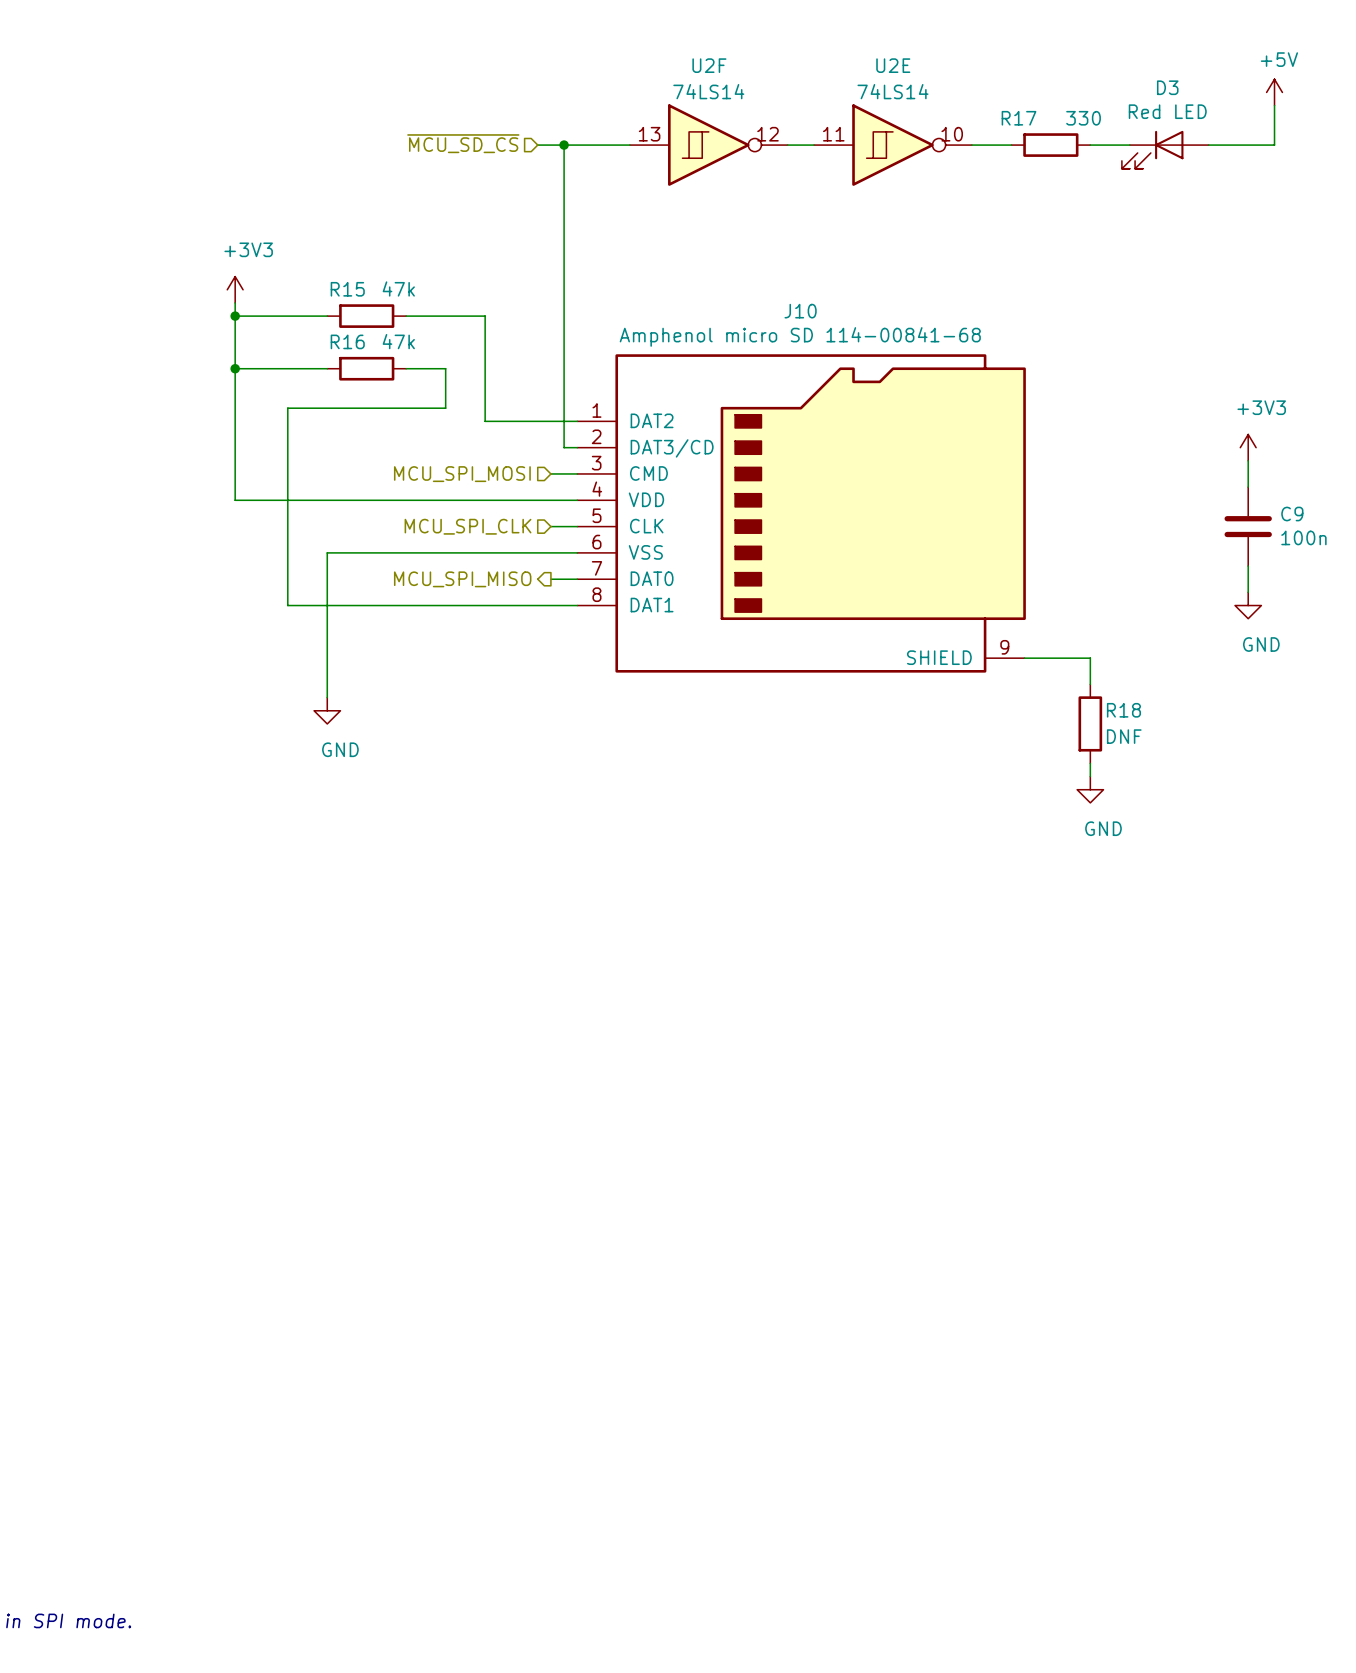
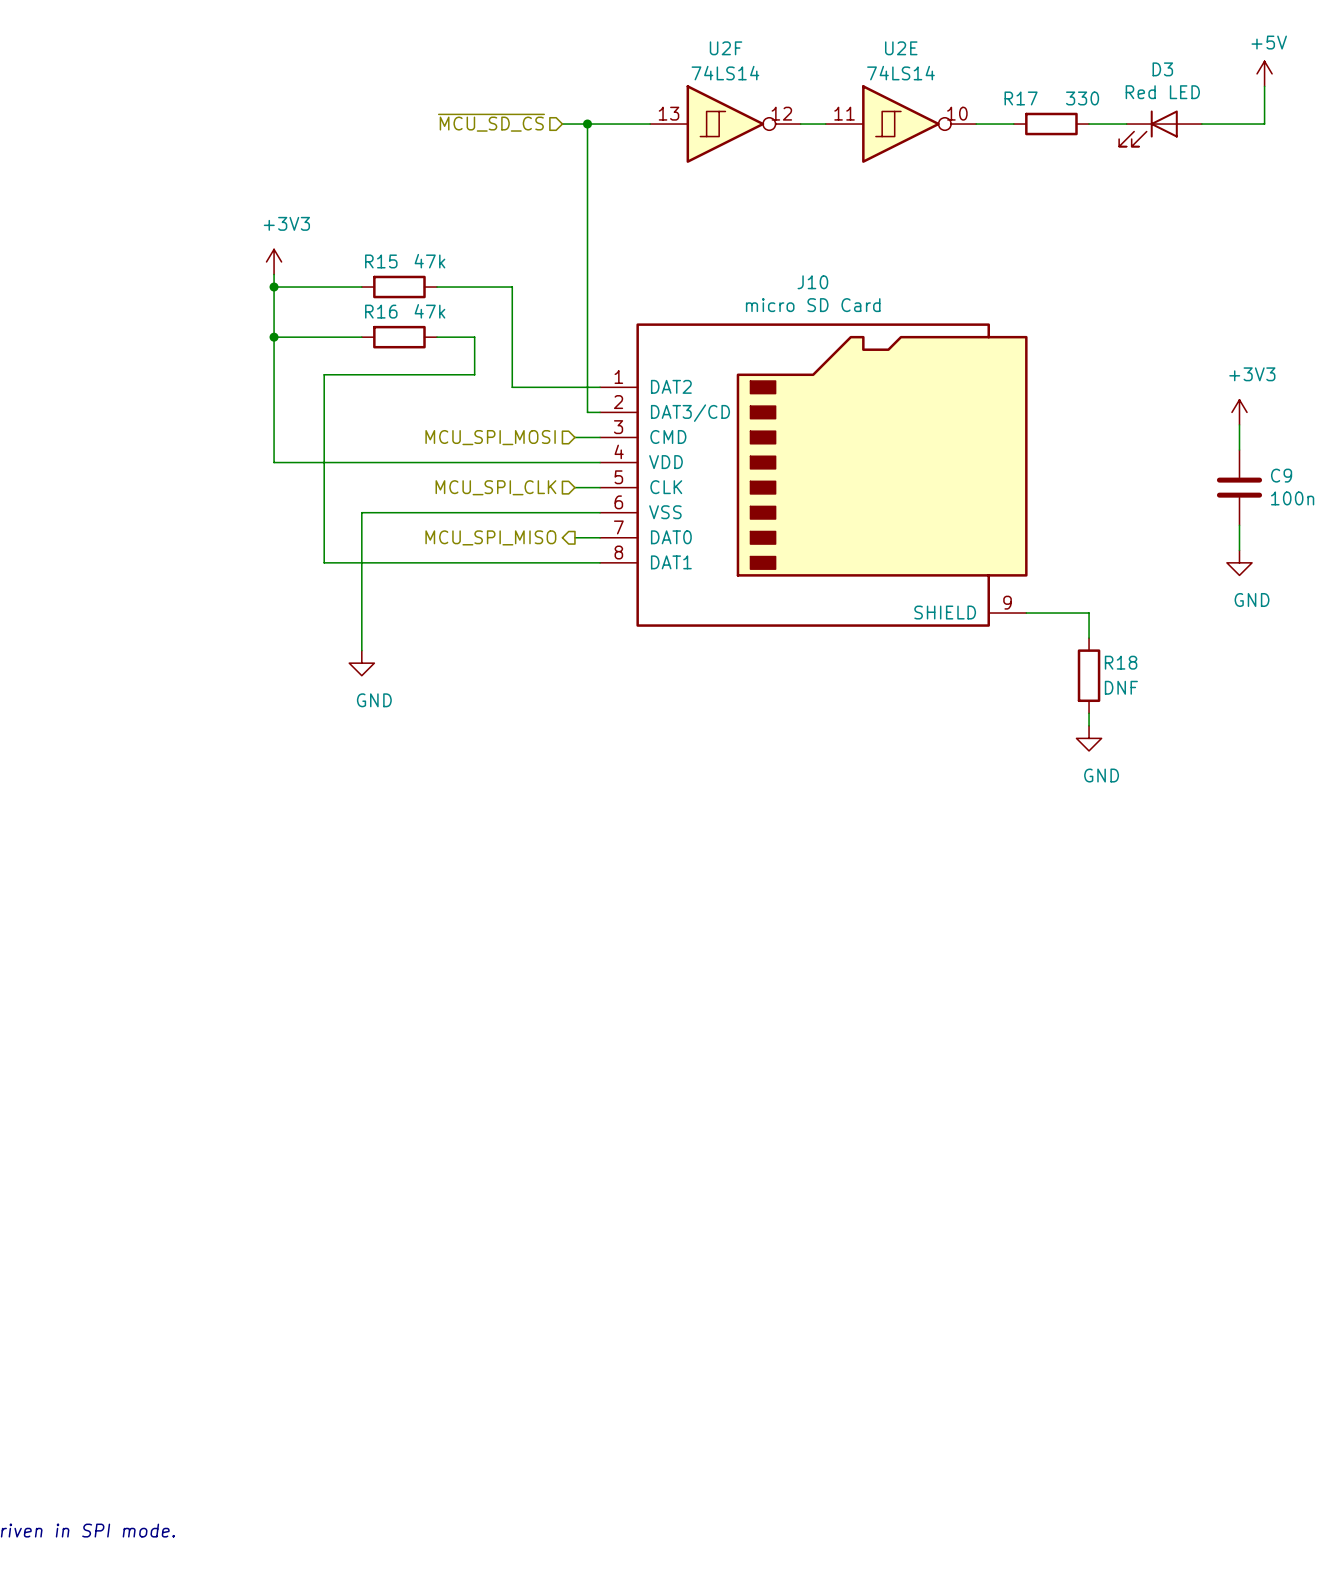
J10 value: Amphenol micro SD 114-00841-68 (800, 336) -> micro SD Card (813, 305)

